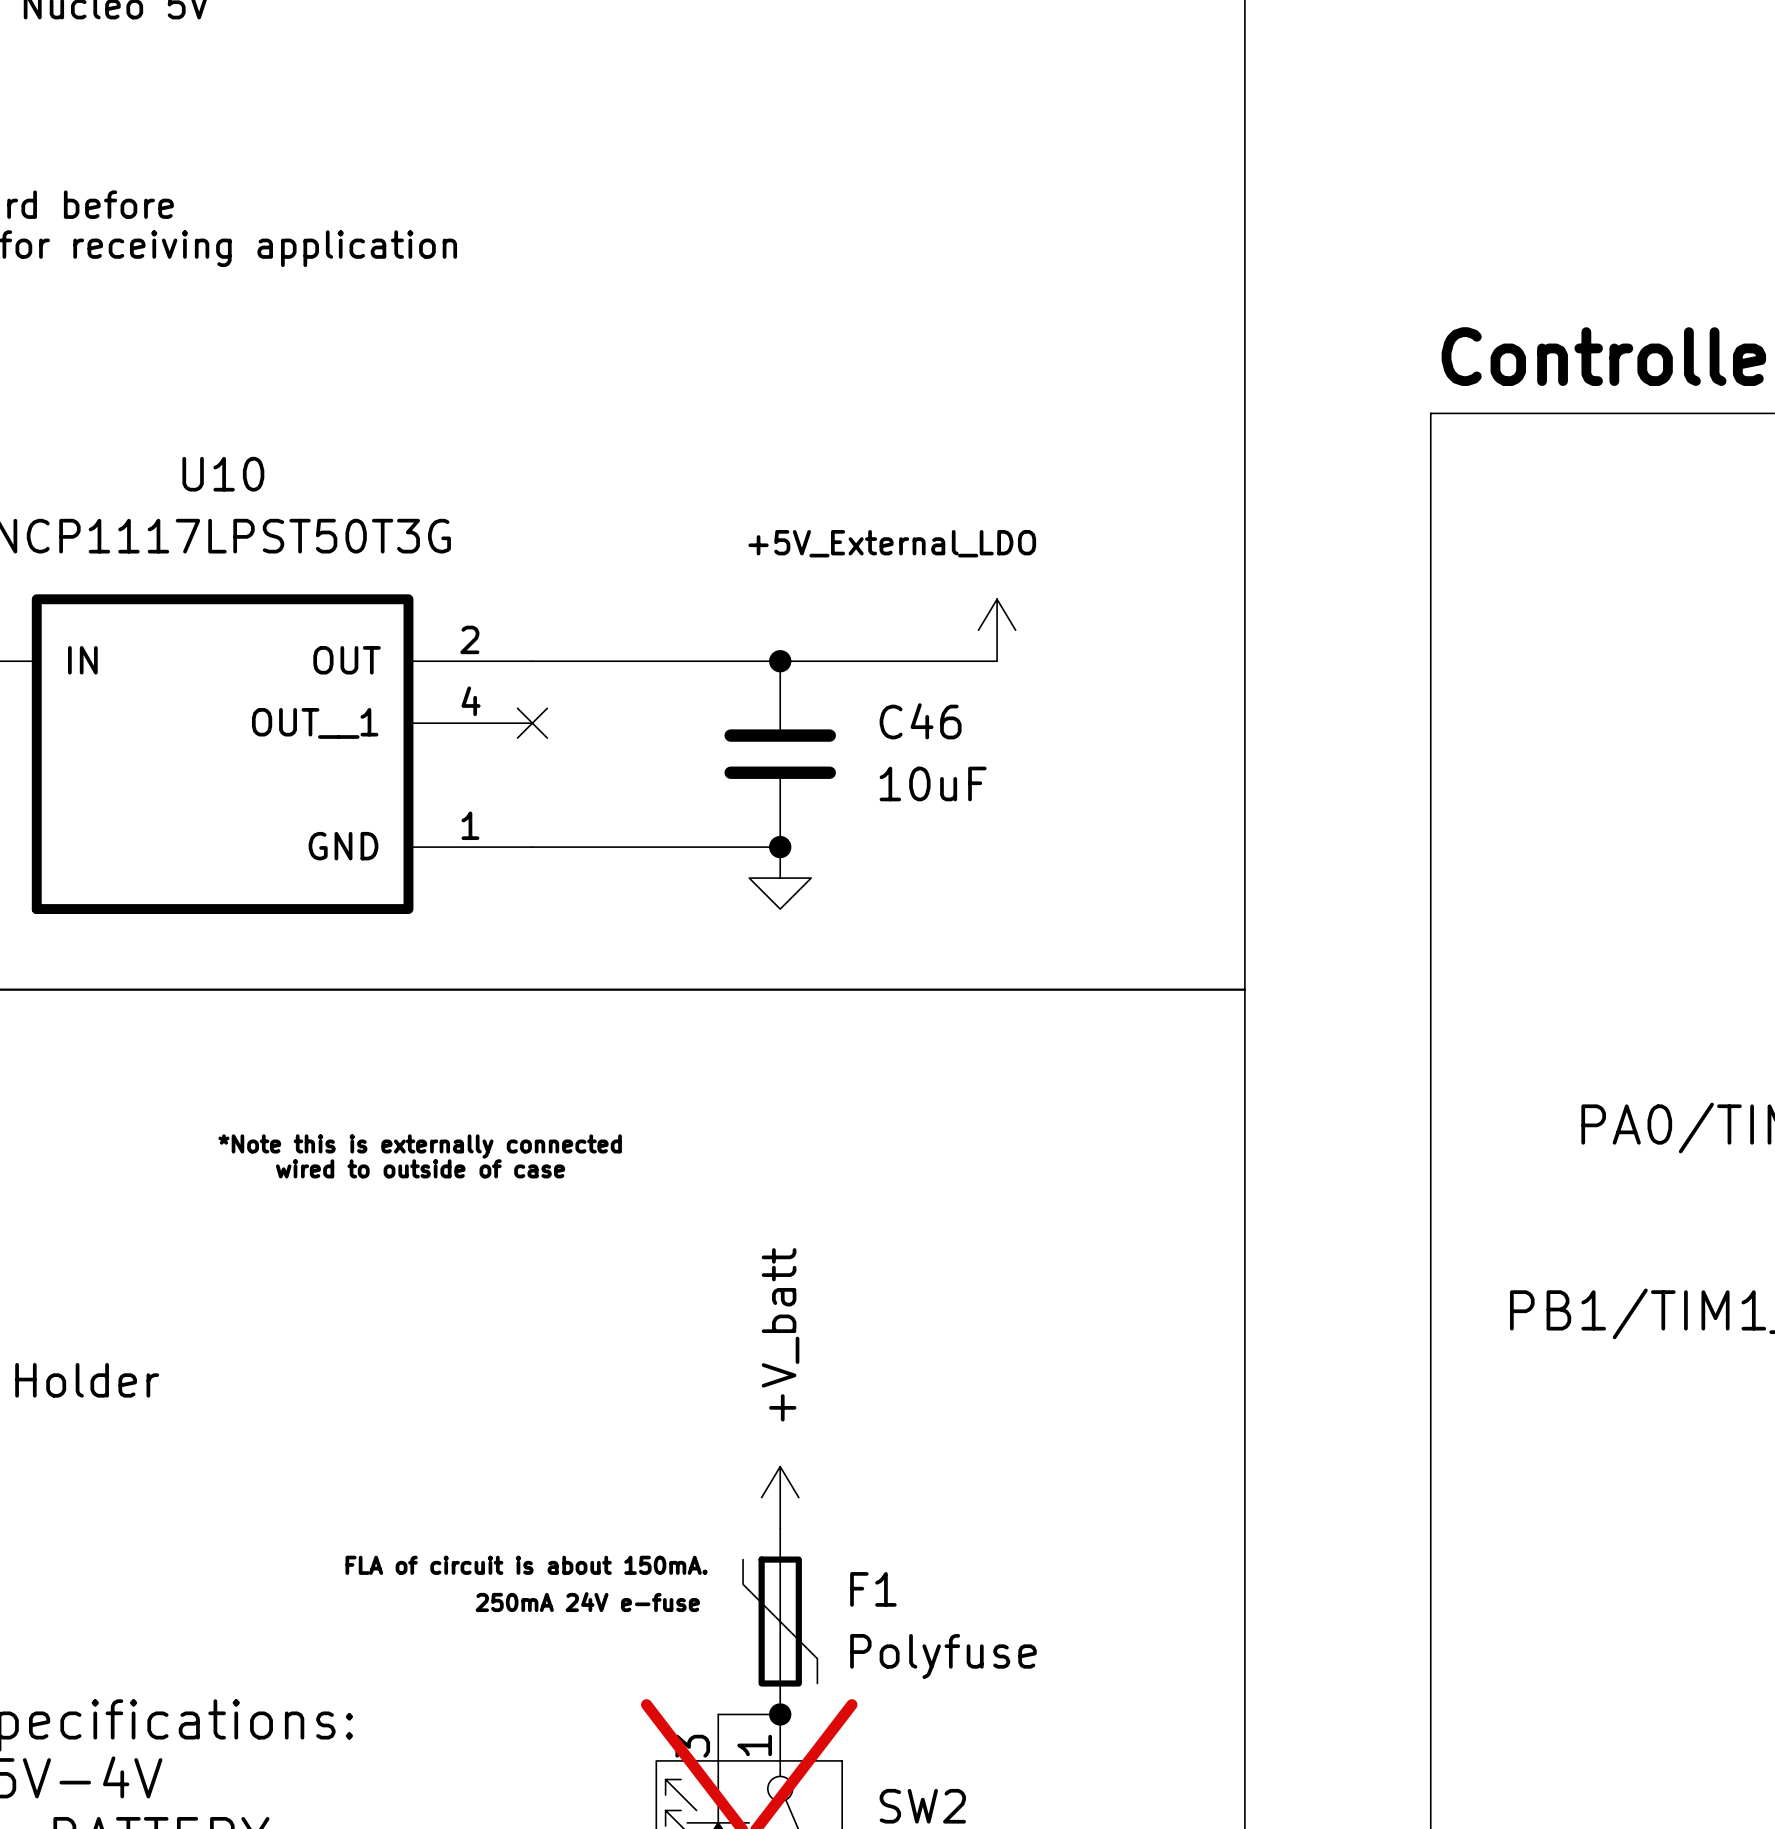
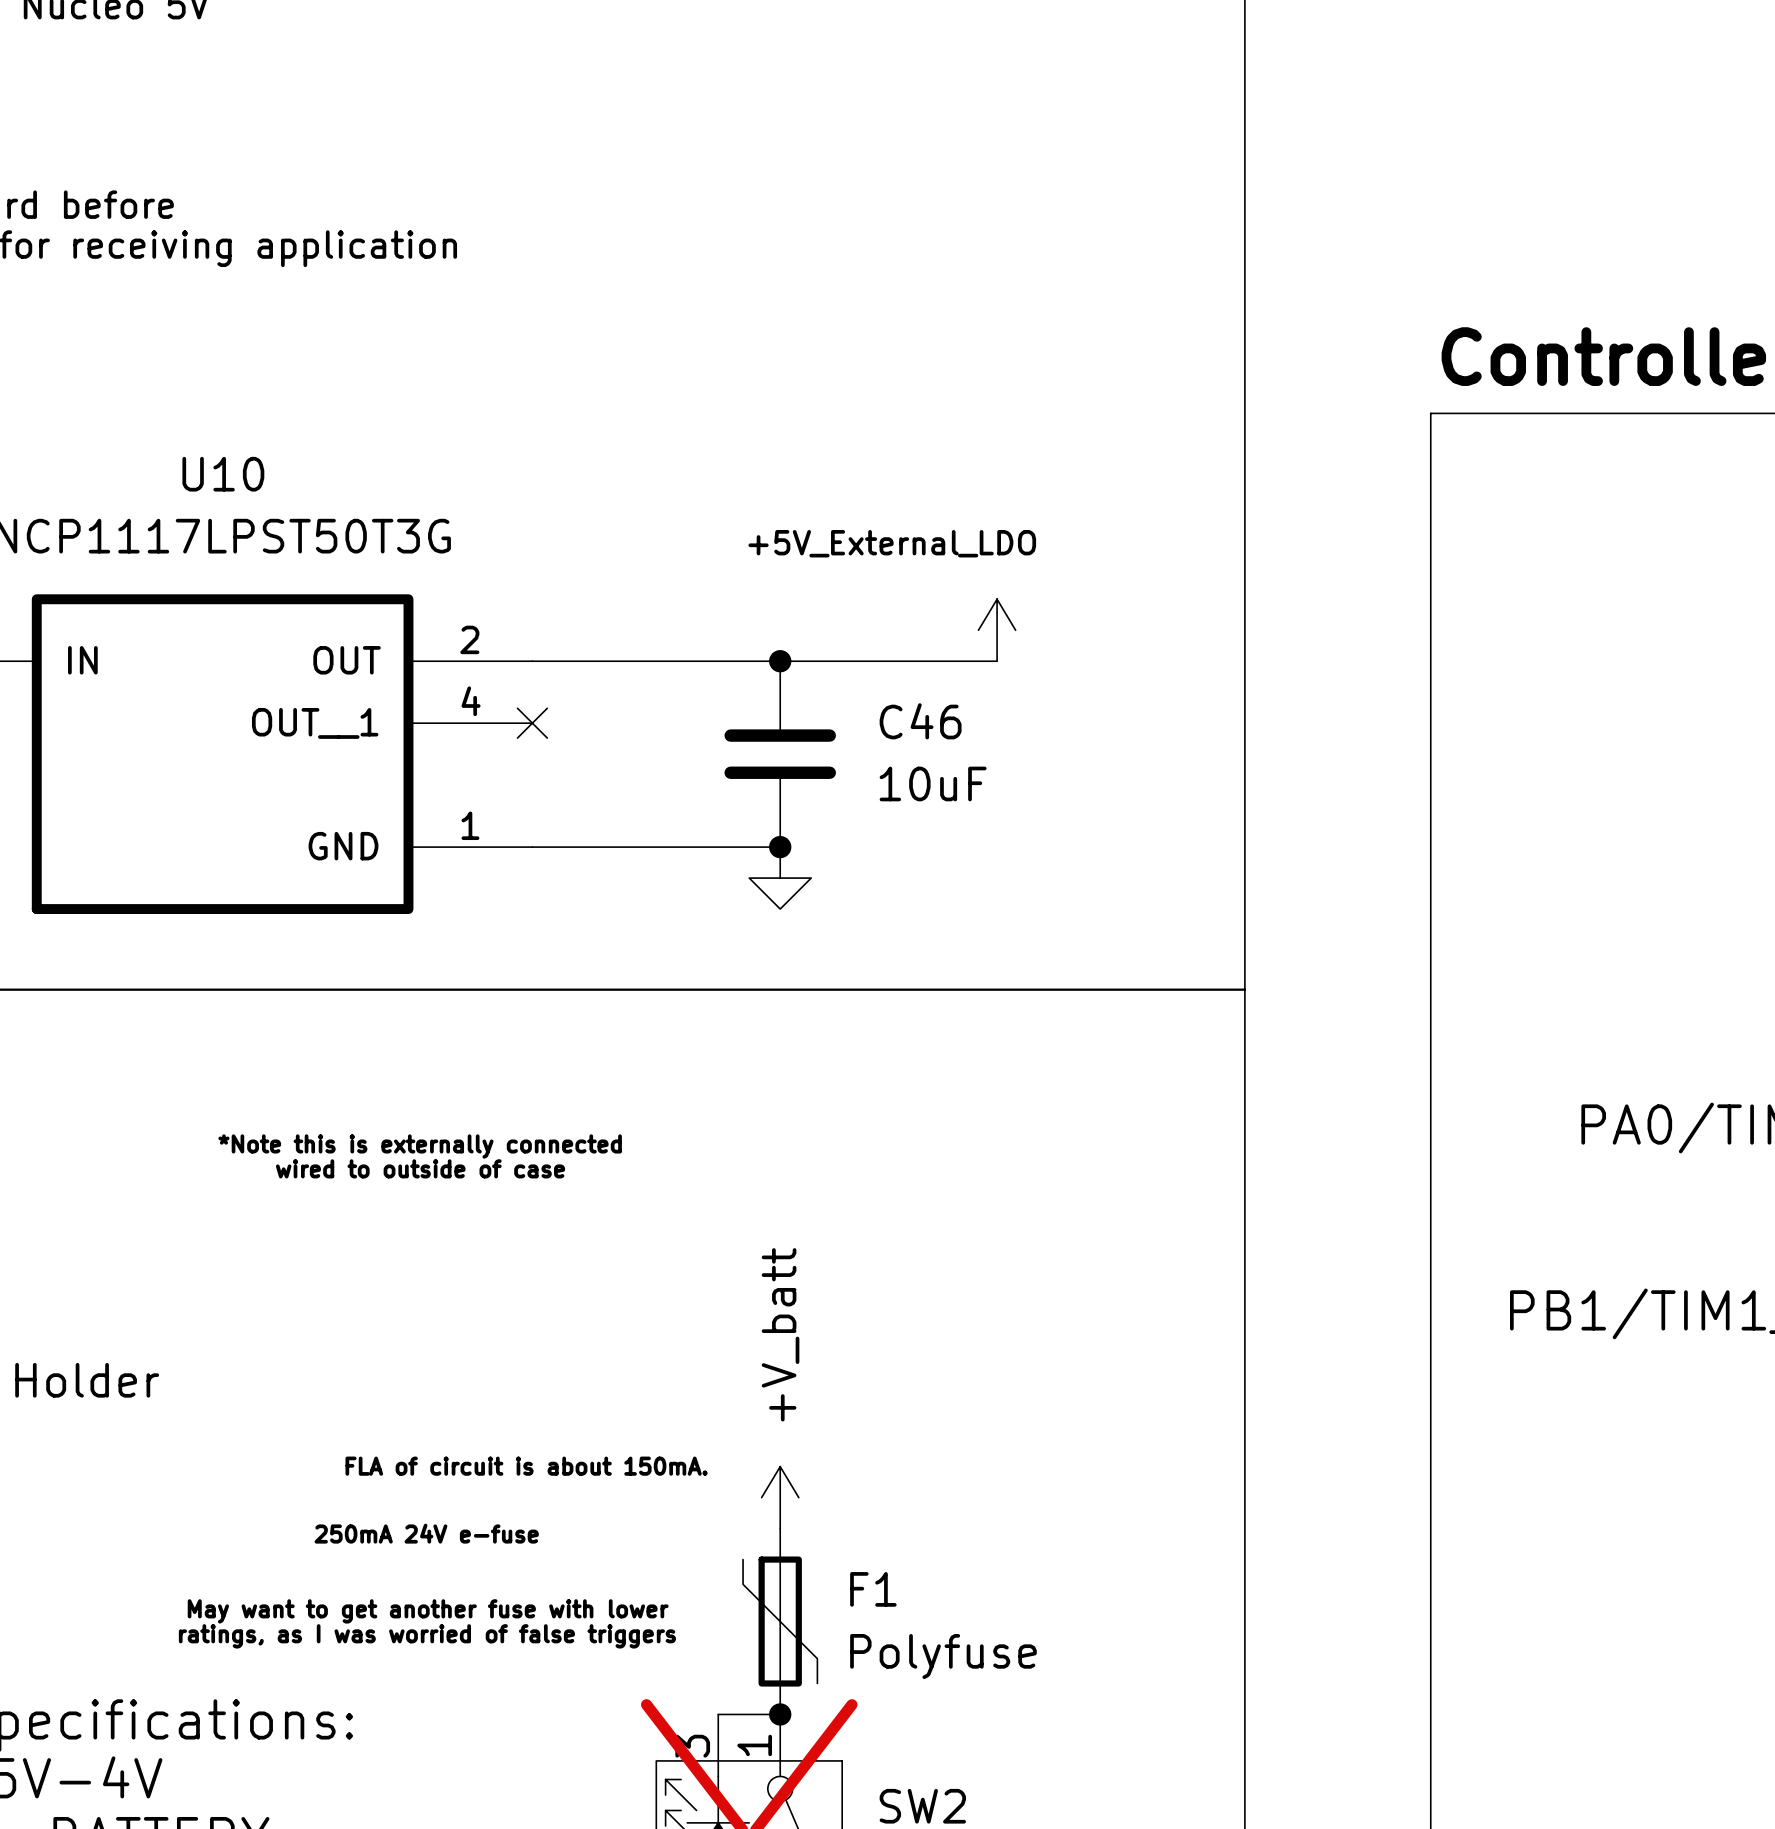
text position: FLA of circuit is about 150mA. (526, 1565) -> FLA of circuit is about 150mA. (526, 1466)
text position: 250mA 24V e-fuse (587, 1602) -> 250mA 24V e-fuse (426, 1533)
text: none -> May want to get another fuse with lower (428, 1611)
text: none -> ratings, as I was worried of false triggers (427, 1636)

